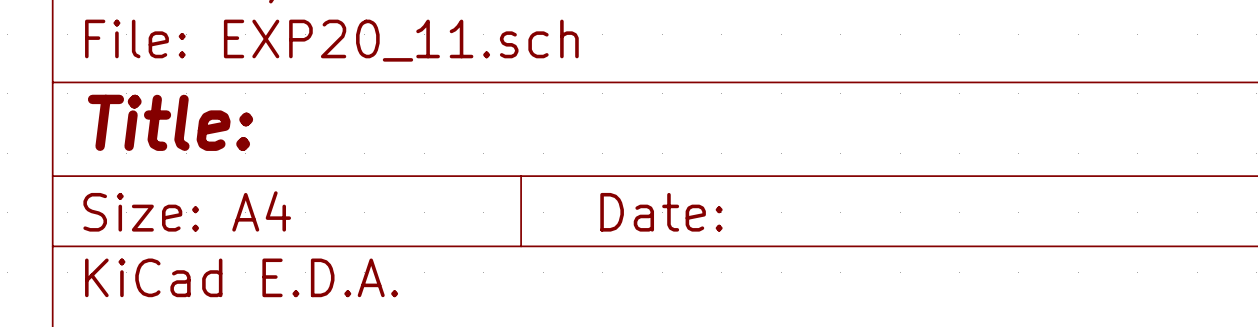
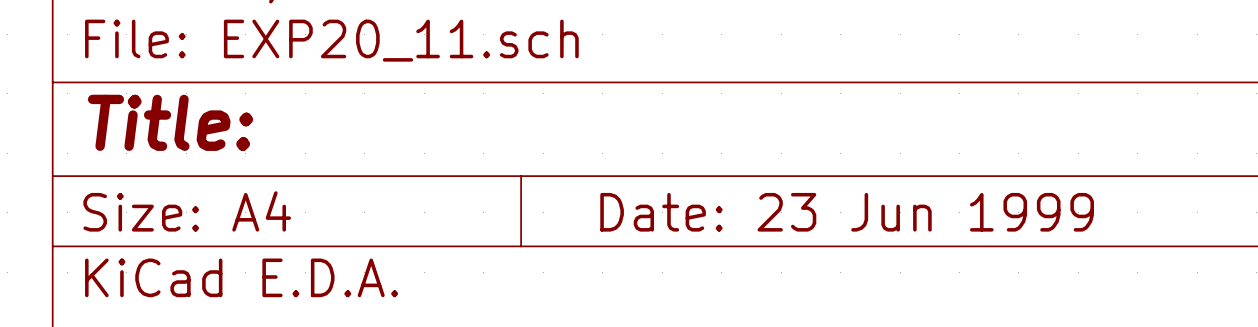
title block: Date: (661, 212) -> Date: 23 Jun 1999 (847, 212)

